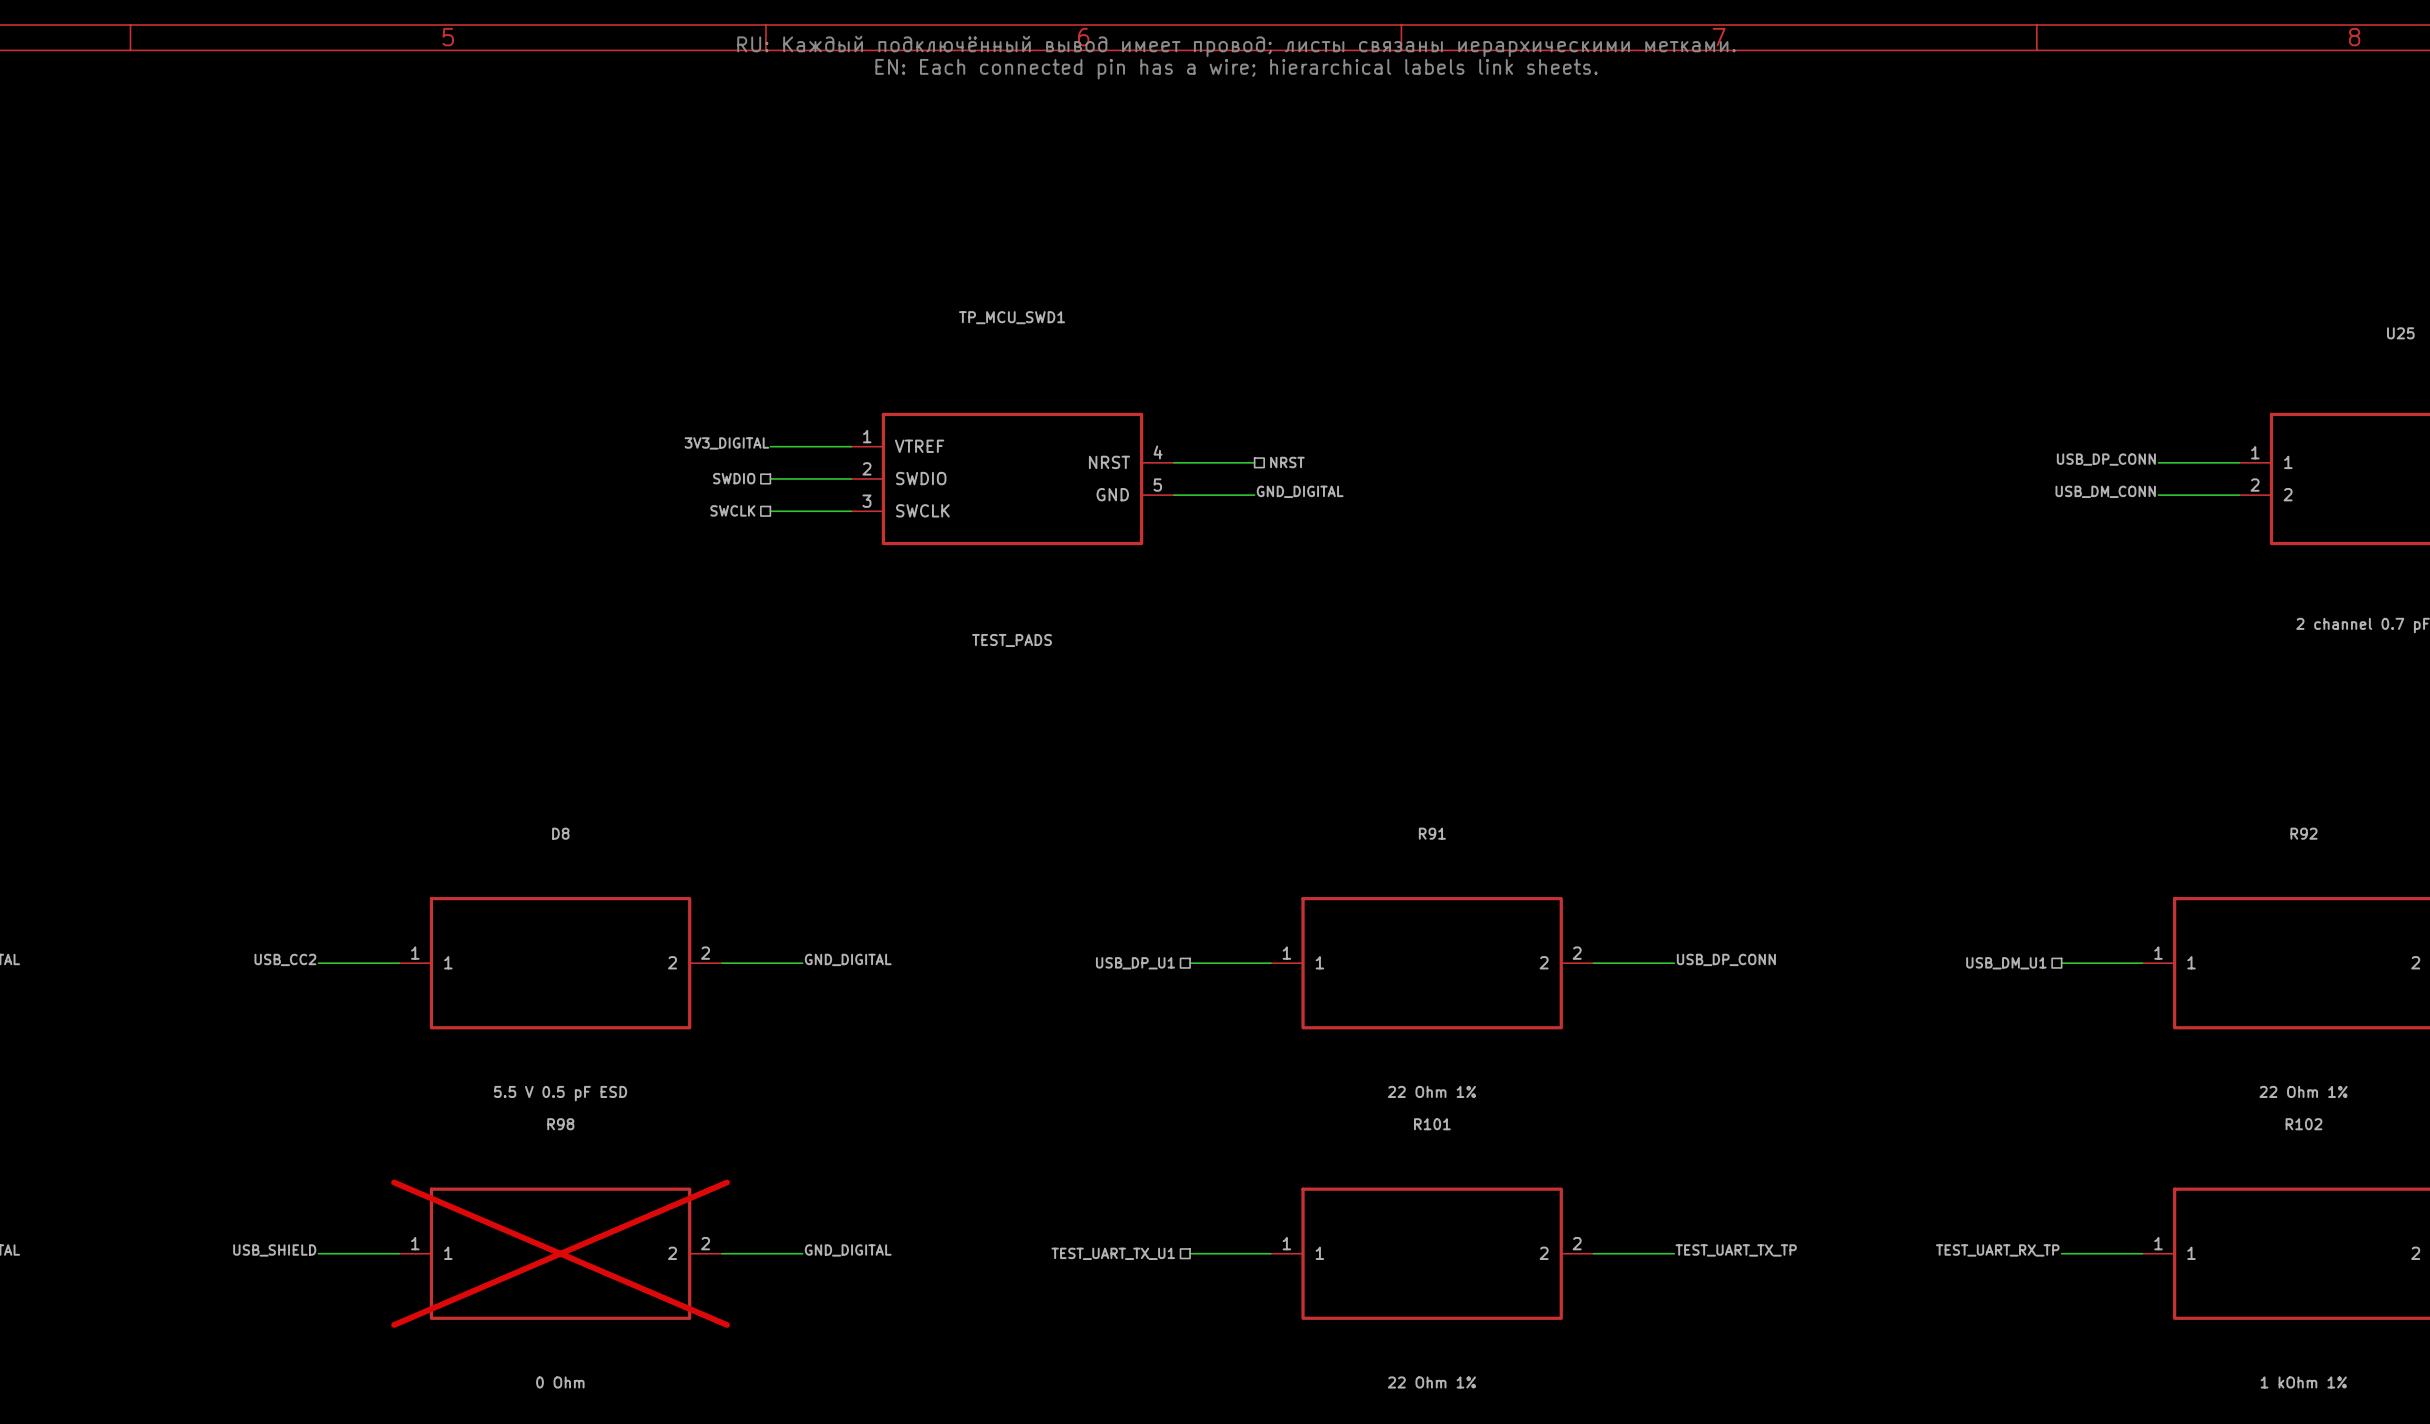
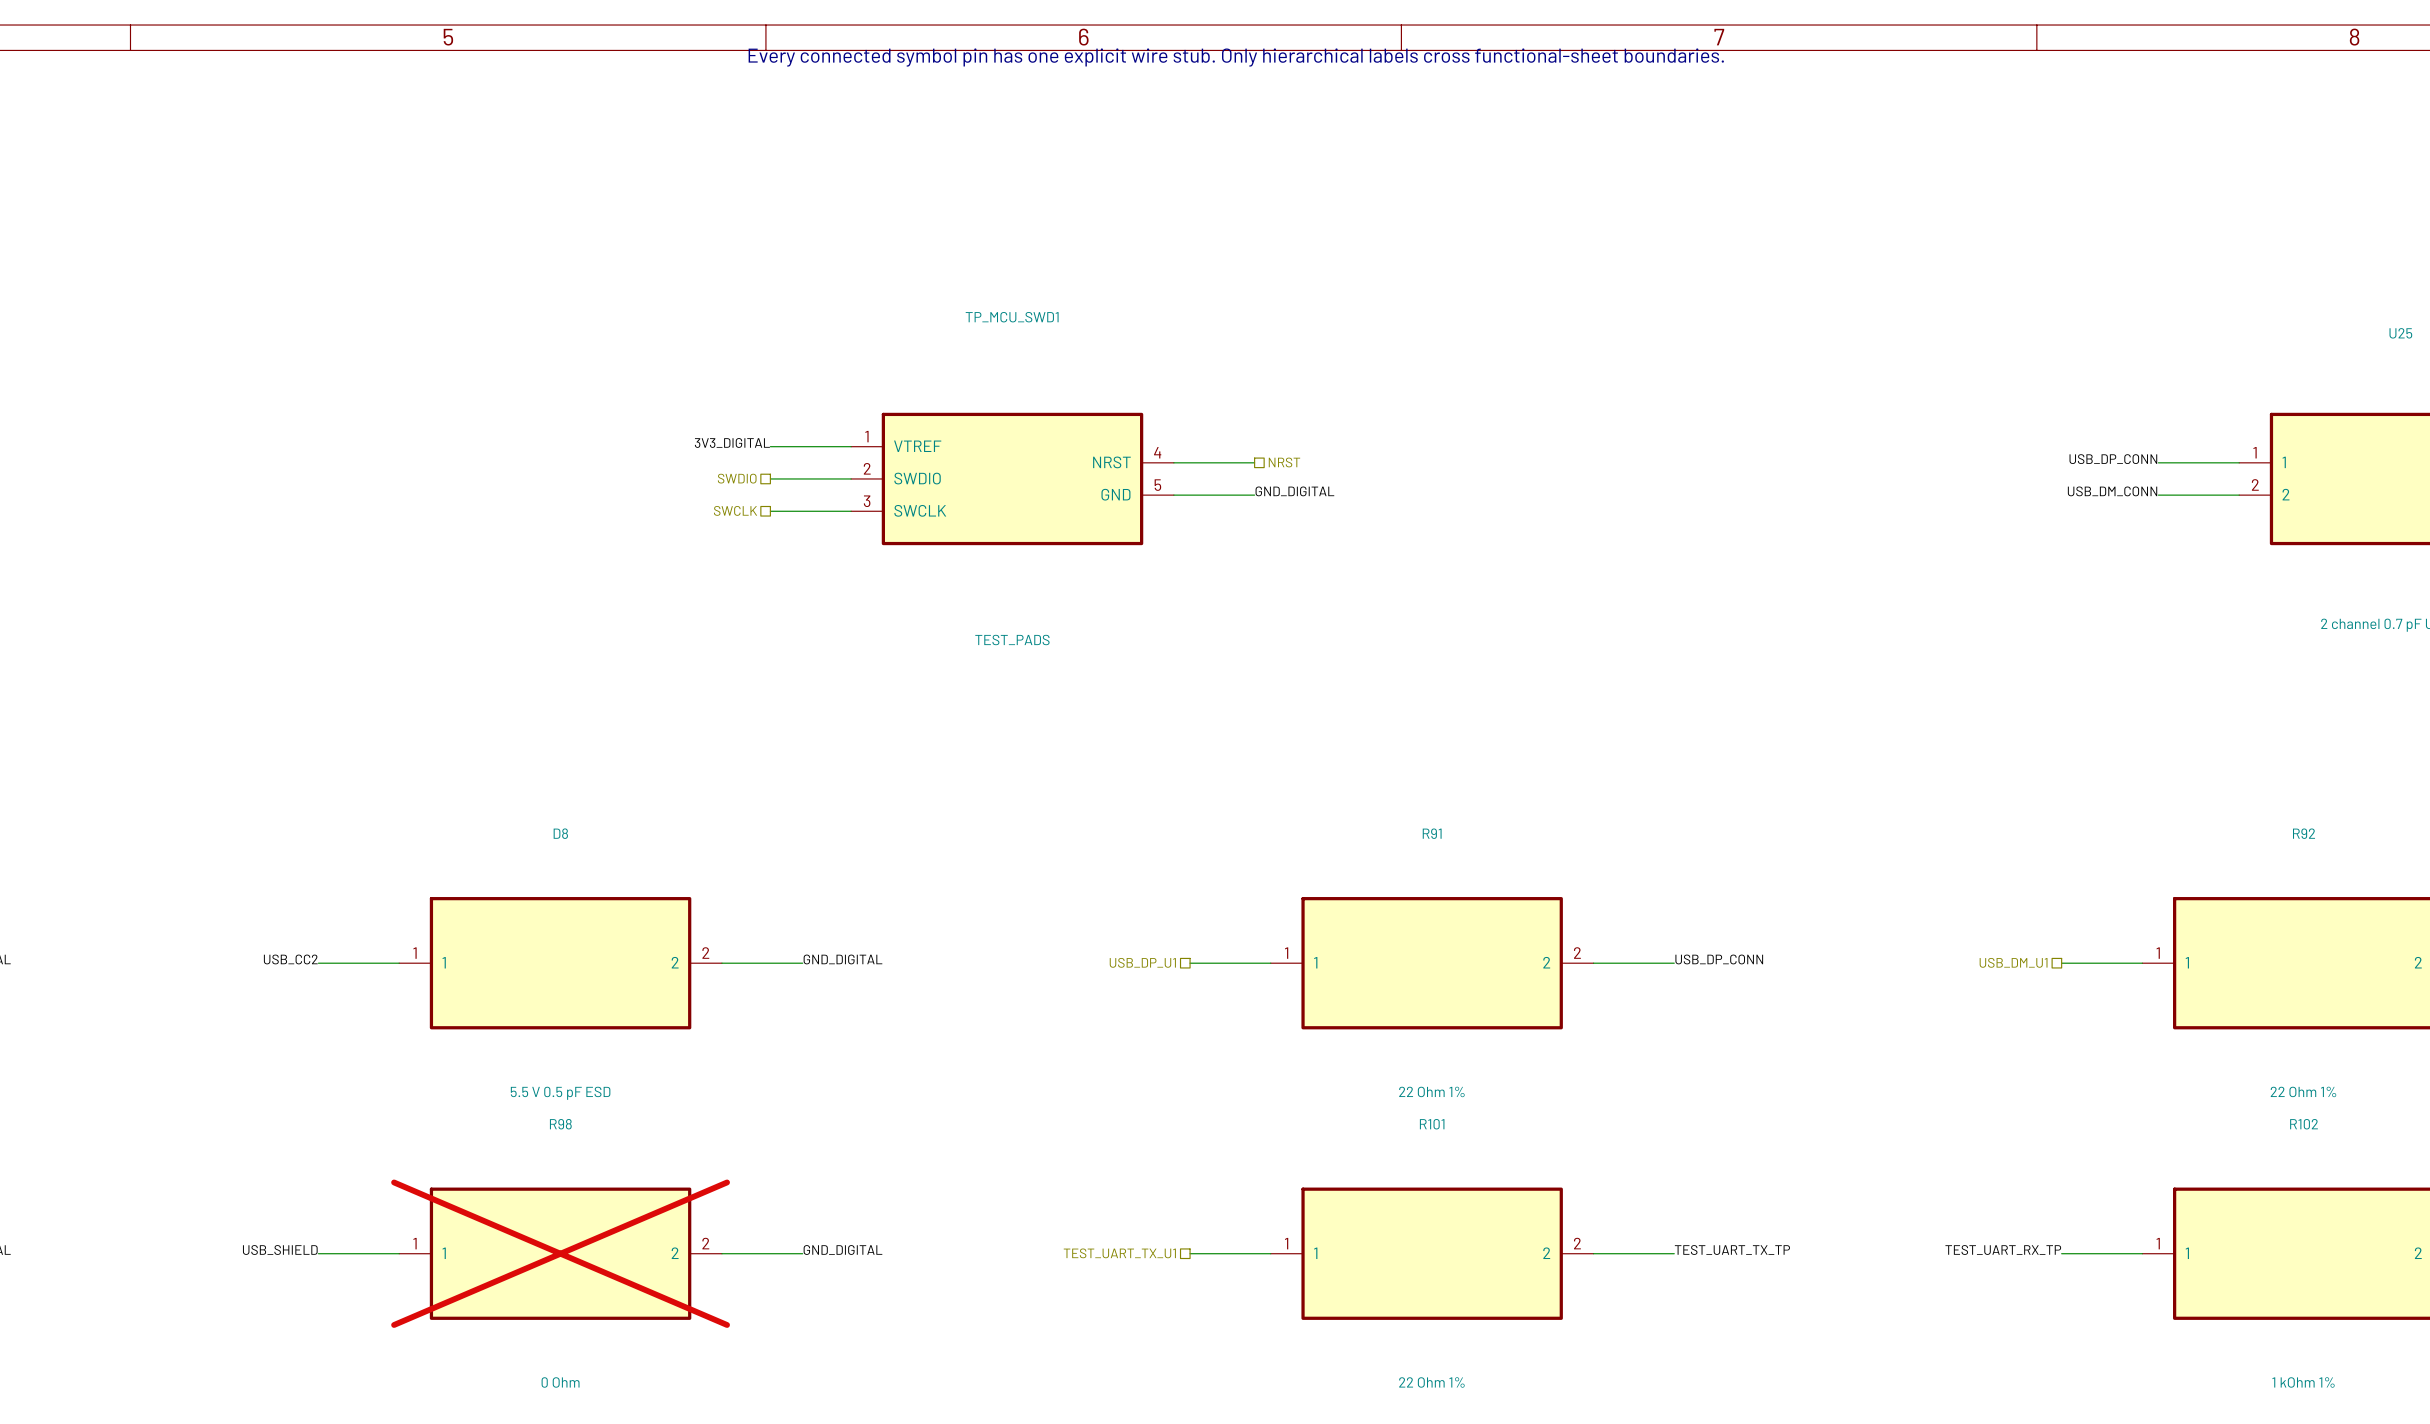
text: RU: Каждый подключённый вывод имеет провод; листы связаны иерархическими метками. (1236, 46) -> none
text: none -> Every connected symbol pin has one explicit wire stub. Only hierarchical labels cross functional-sheet boundaries. (1236, 57)
text: EN: Each connected pin has a wire; hierarchical labels link sheets. (1236, 69) -> none

